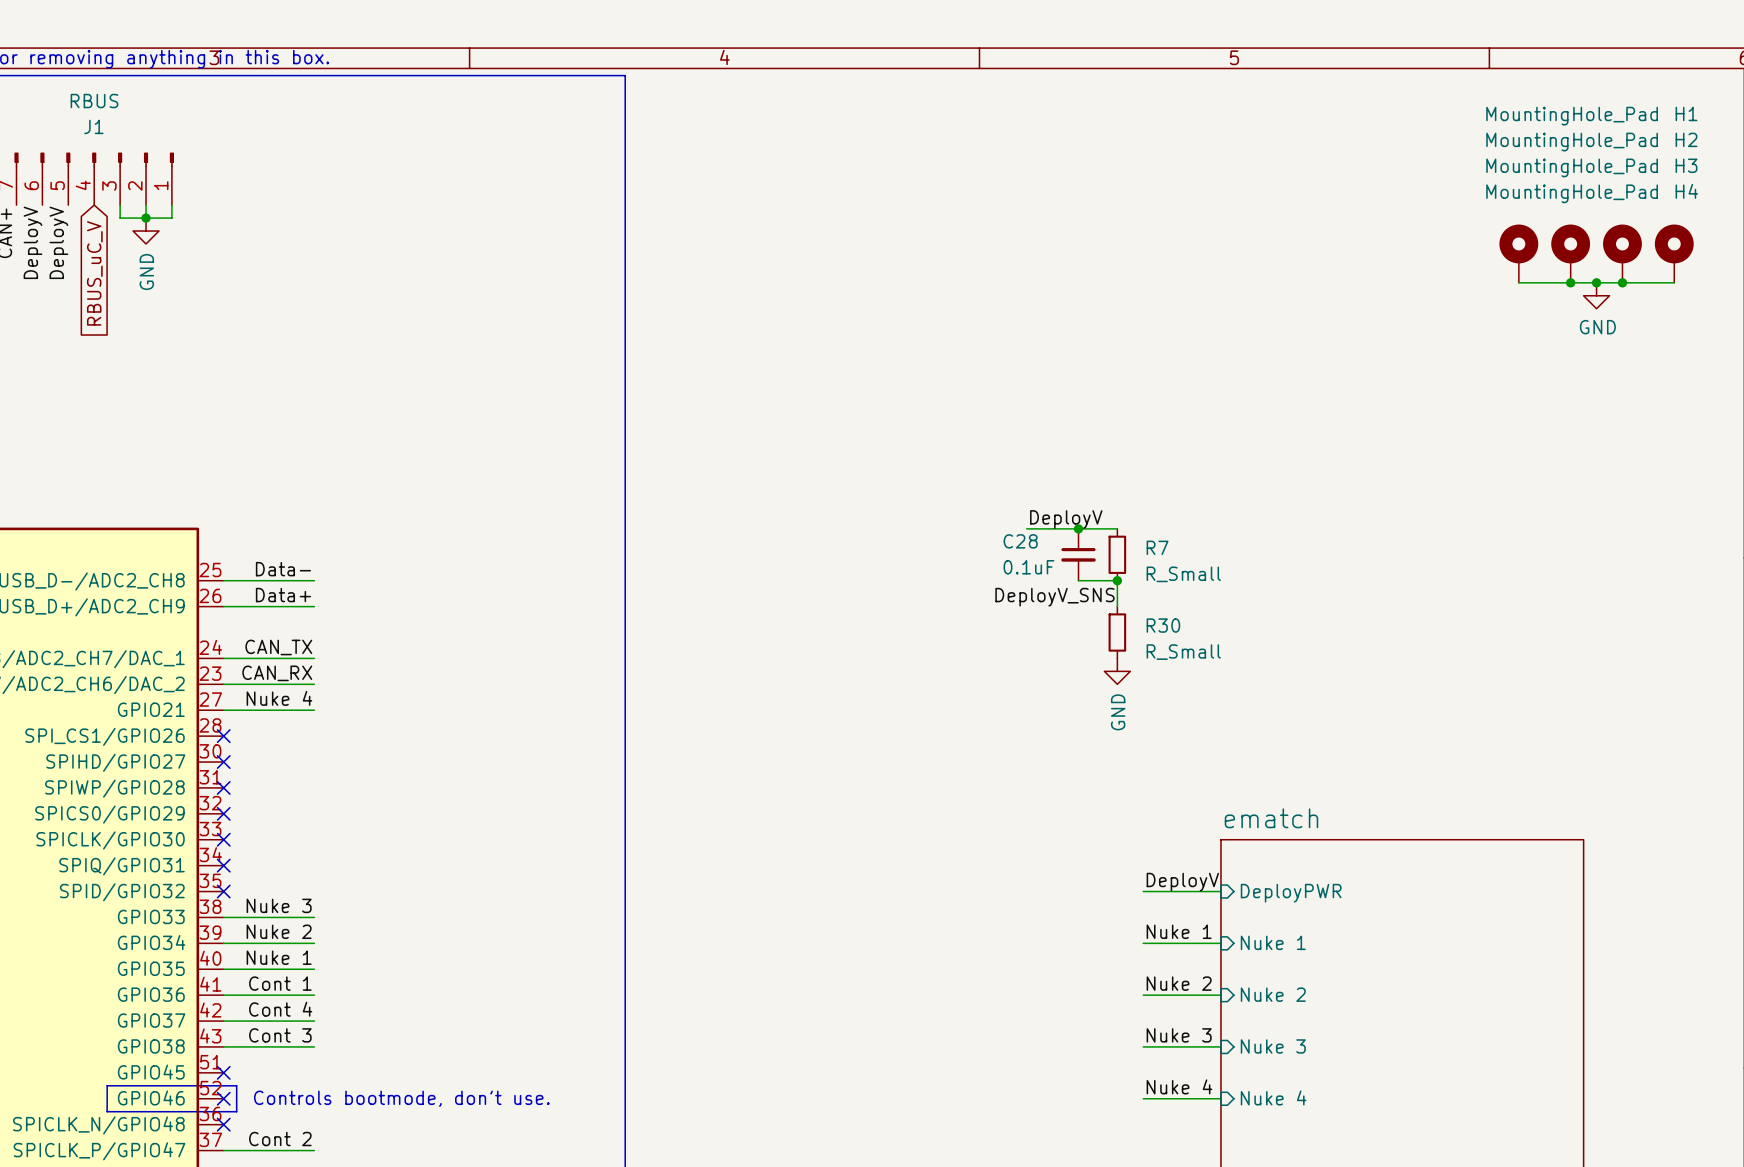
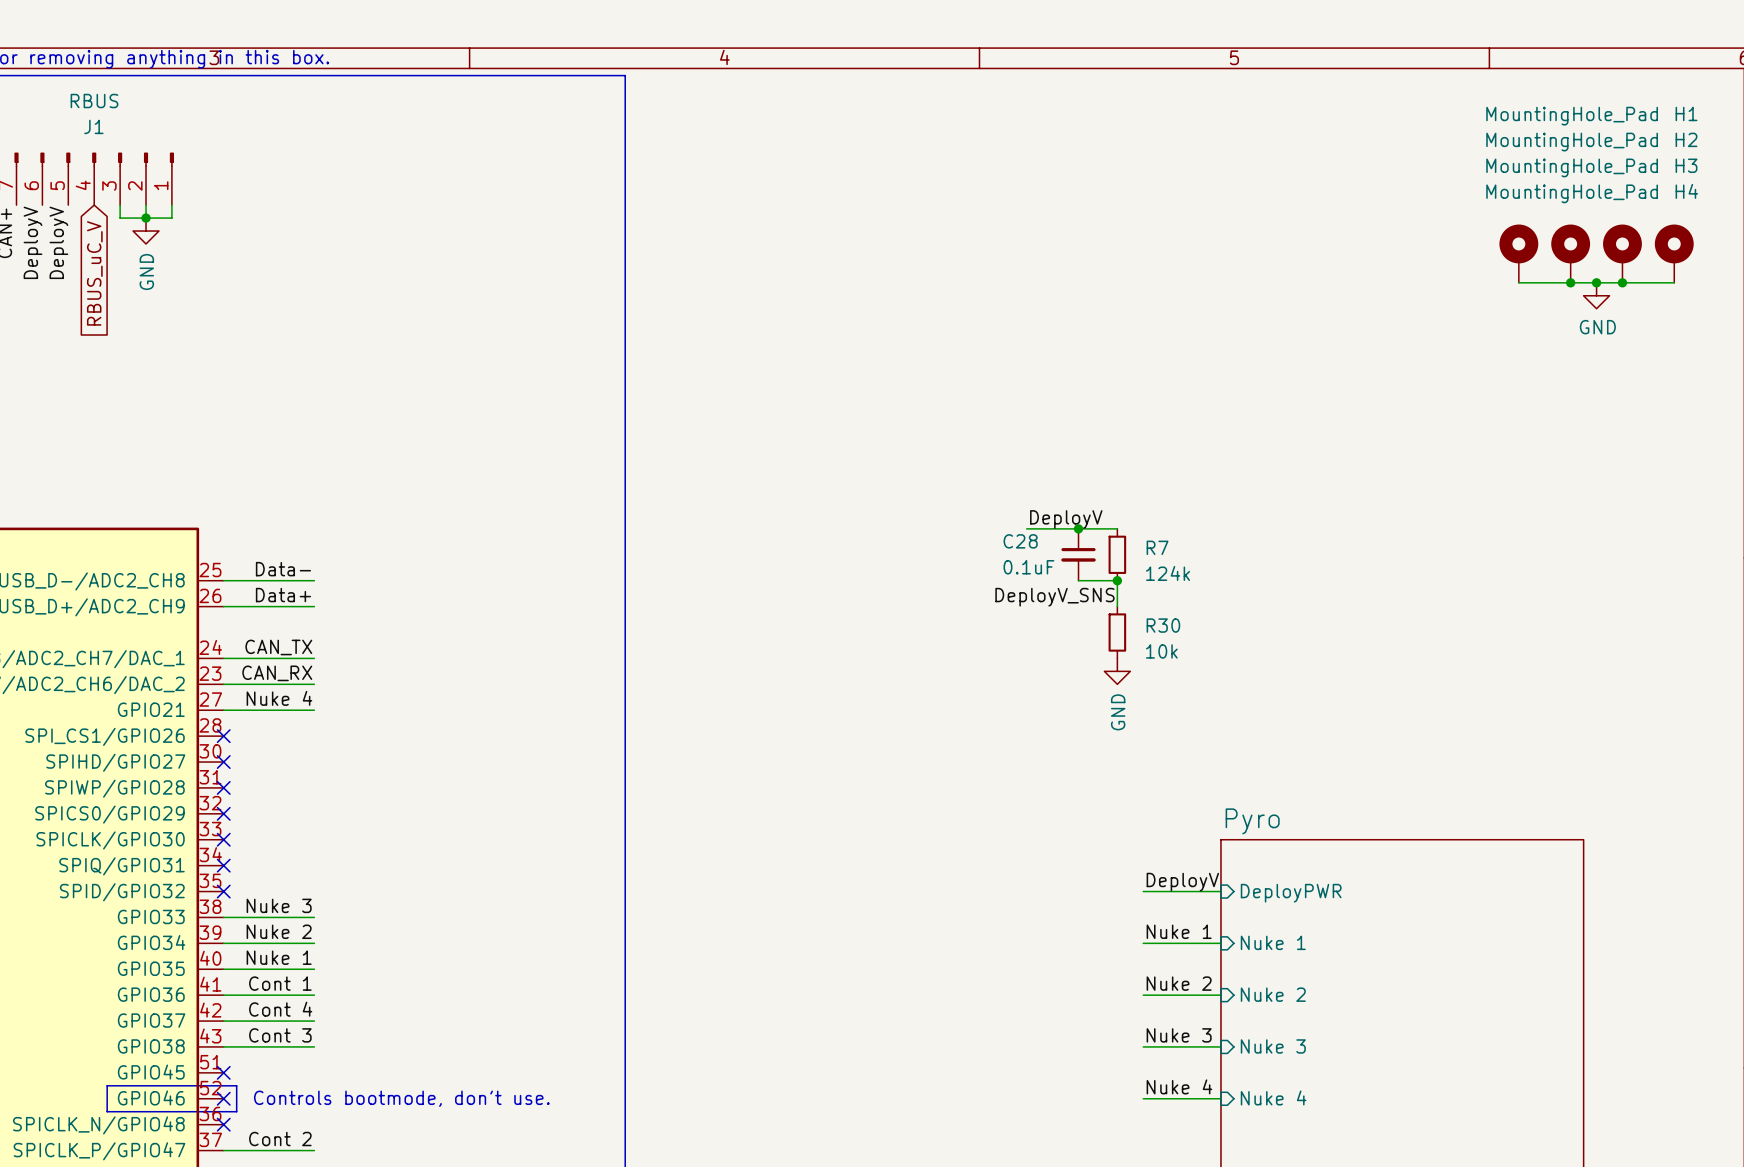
R7 value: R_Small (1183, 574) -> 124k (1168, 573)
R30 value: R_Small (1183, 652) -> 10k (1161, 651)
sheet ematch name: ematch (1271, 818) -> Pyro (1252, 821)

